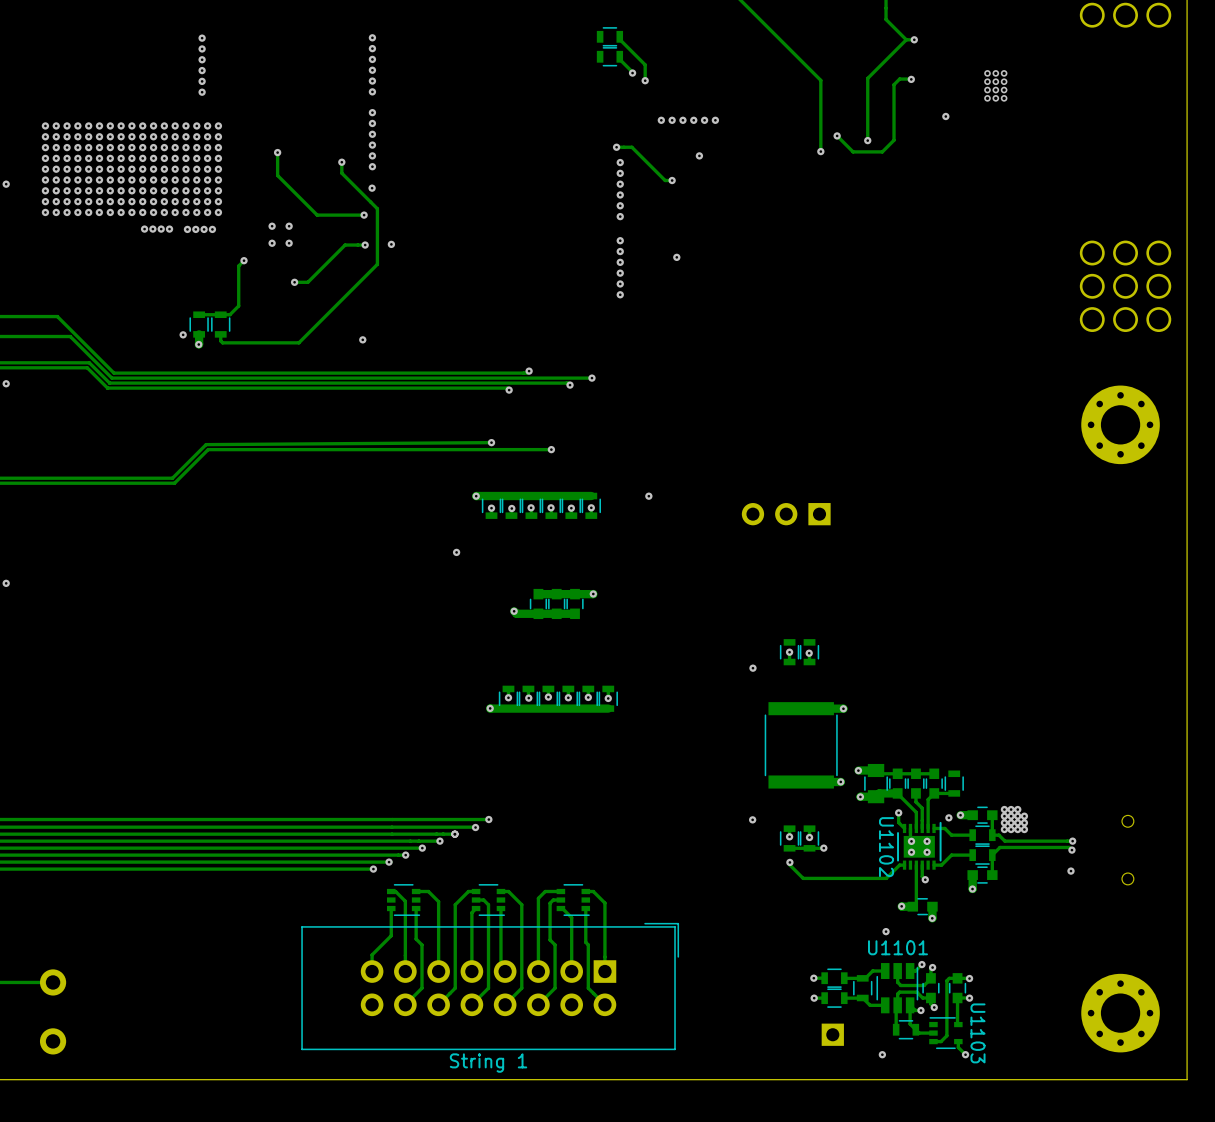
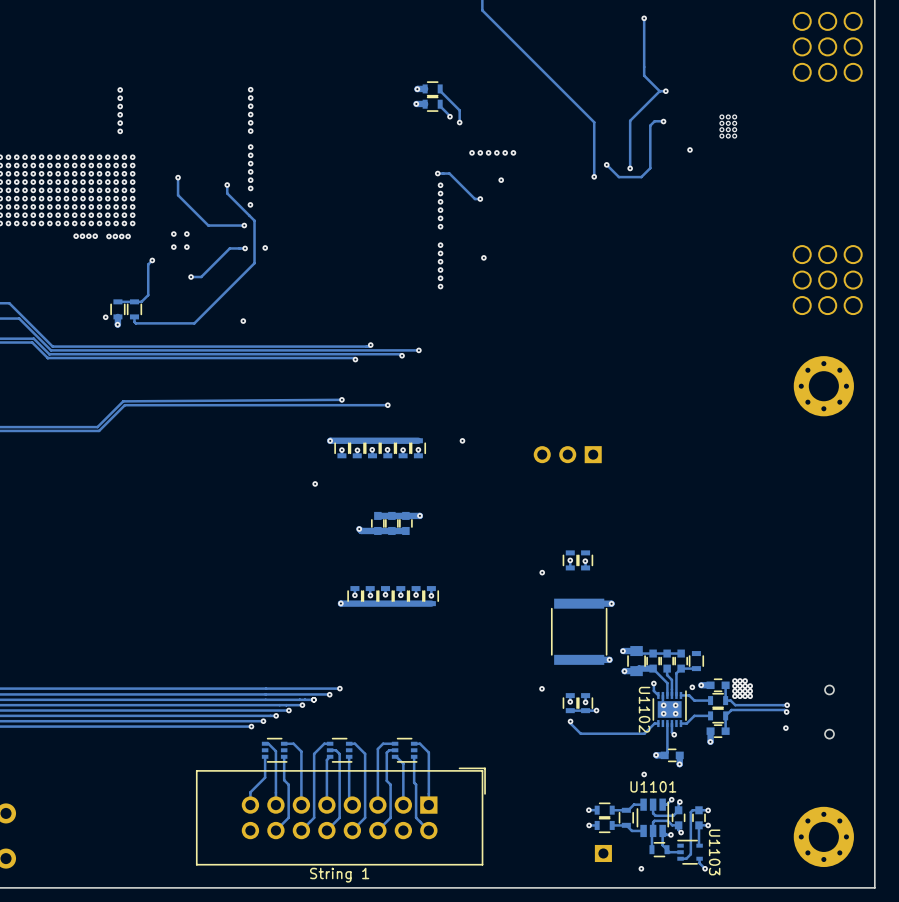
track: none -> (425, 88) (417, 89)
via: none -> (417, 89)
track: none -> (416, 103) (425, 104)
via: none -> (416, 103)

